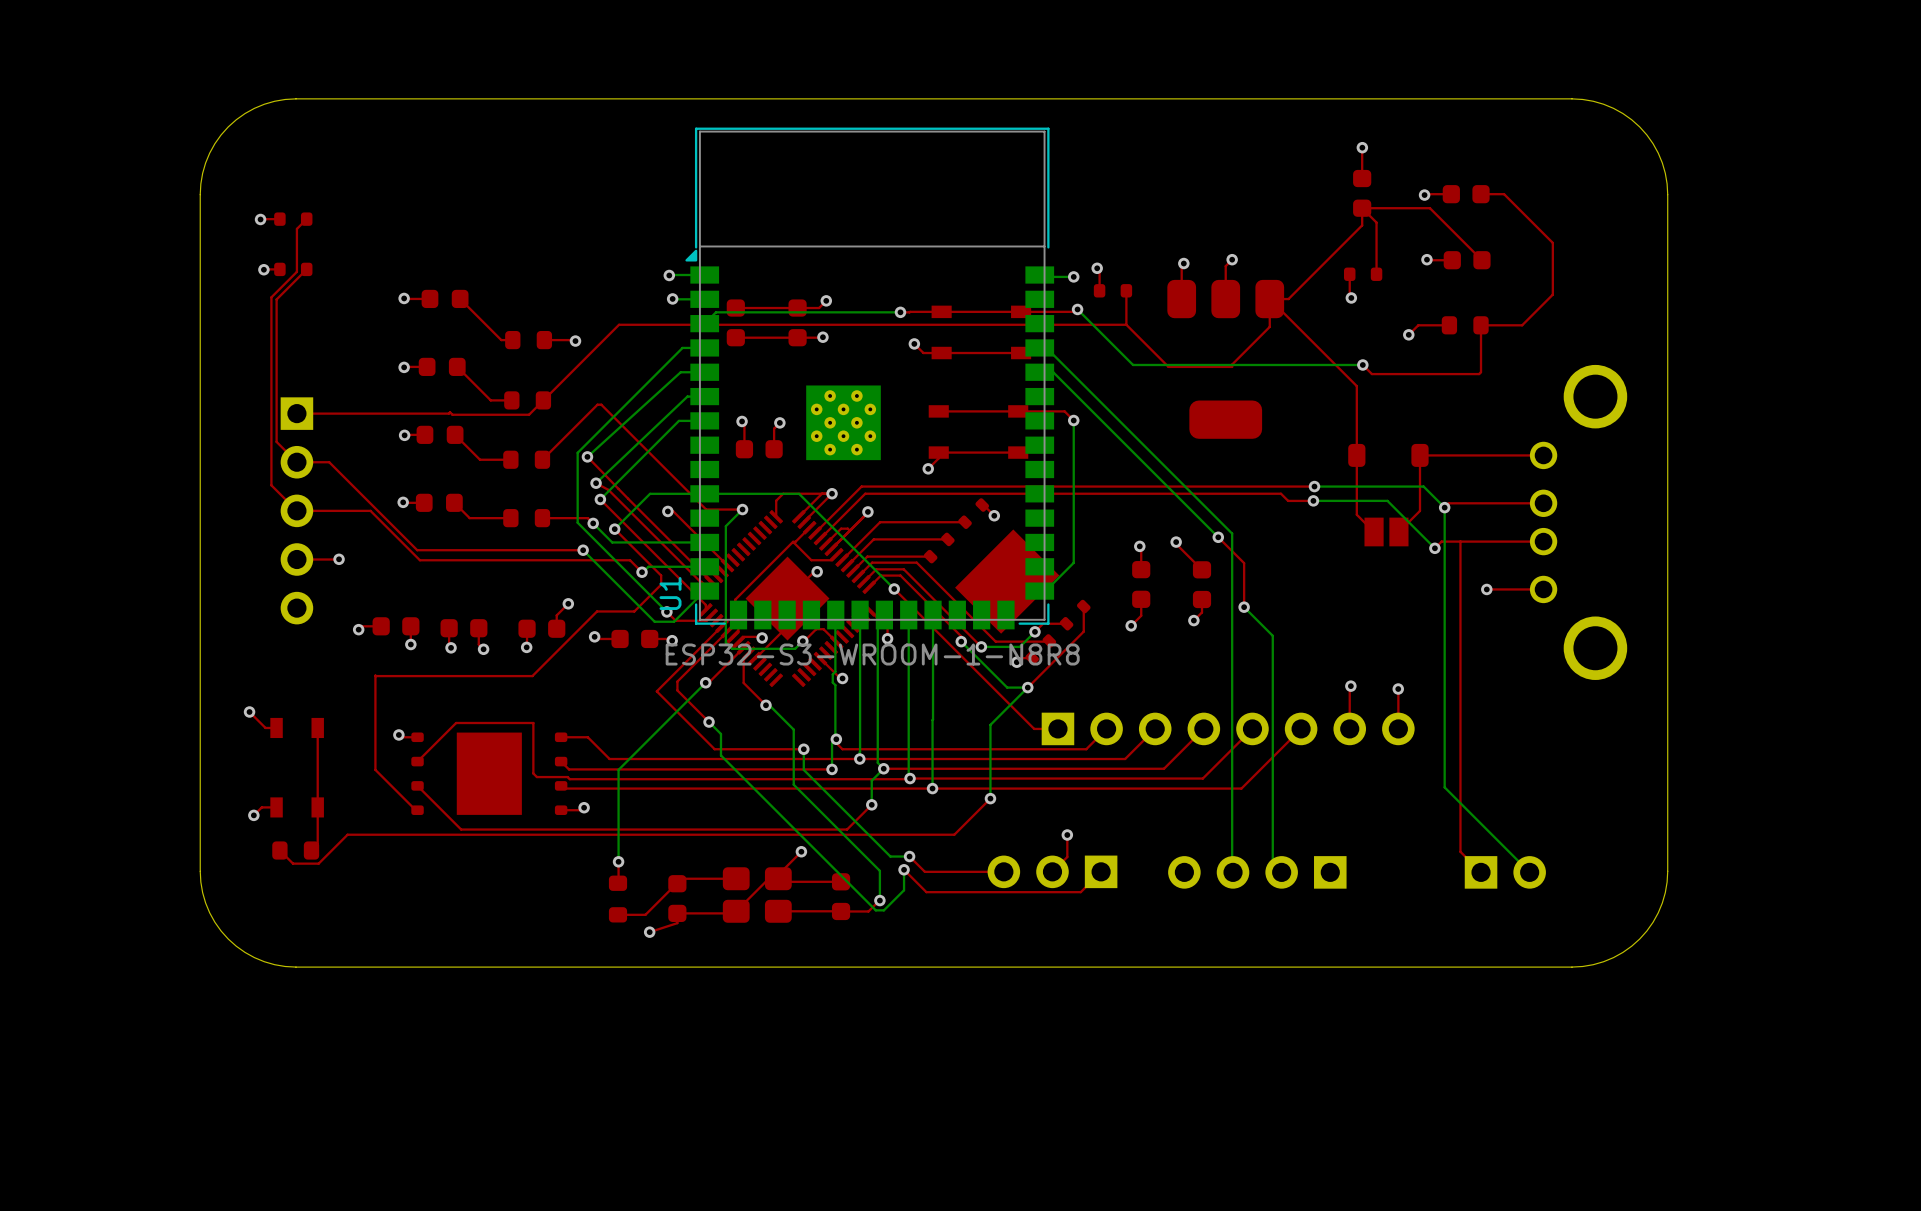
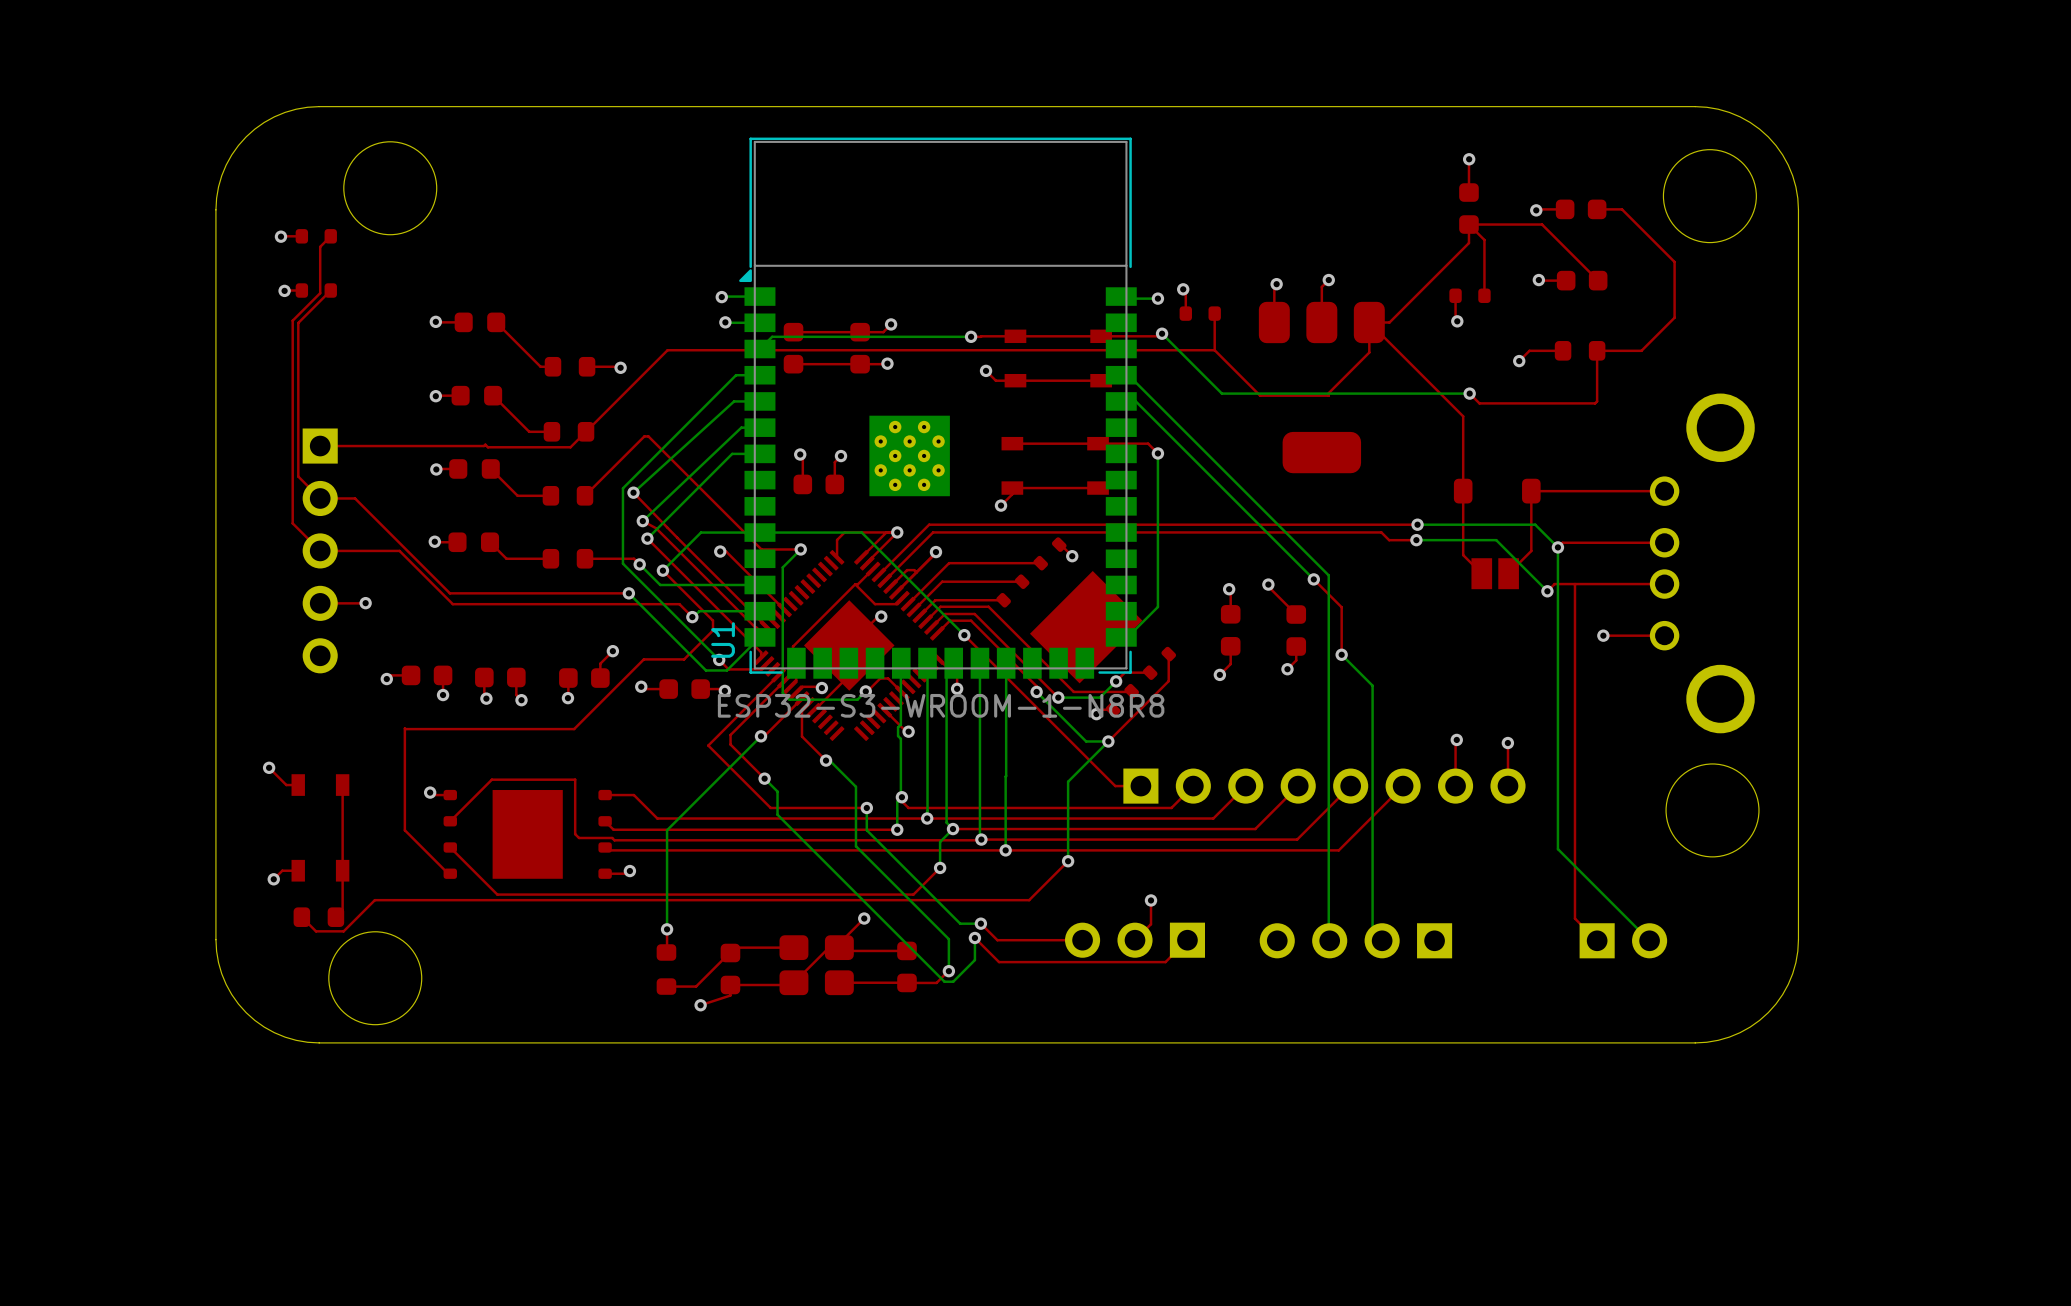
round board edge: none -> [343, 141, 438, 236]
round board edge: none -> [1662, 149, 1757, 244]
round board edge: none -> [1665, 763, 1760, 858]
round board edge: none -> [328, 931, 423, 1026]

